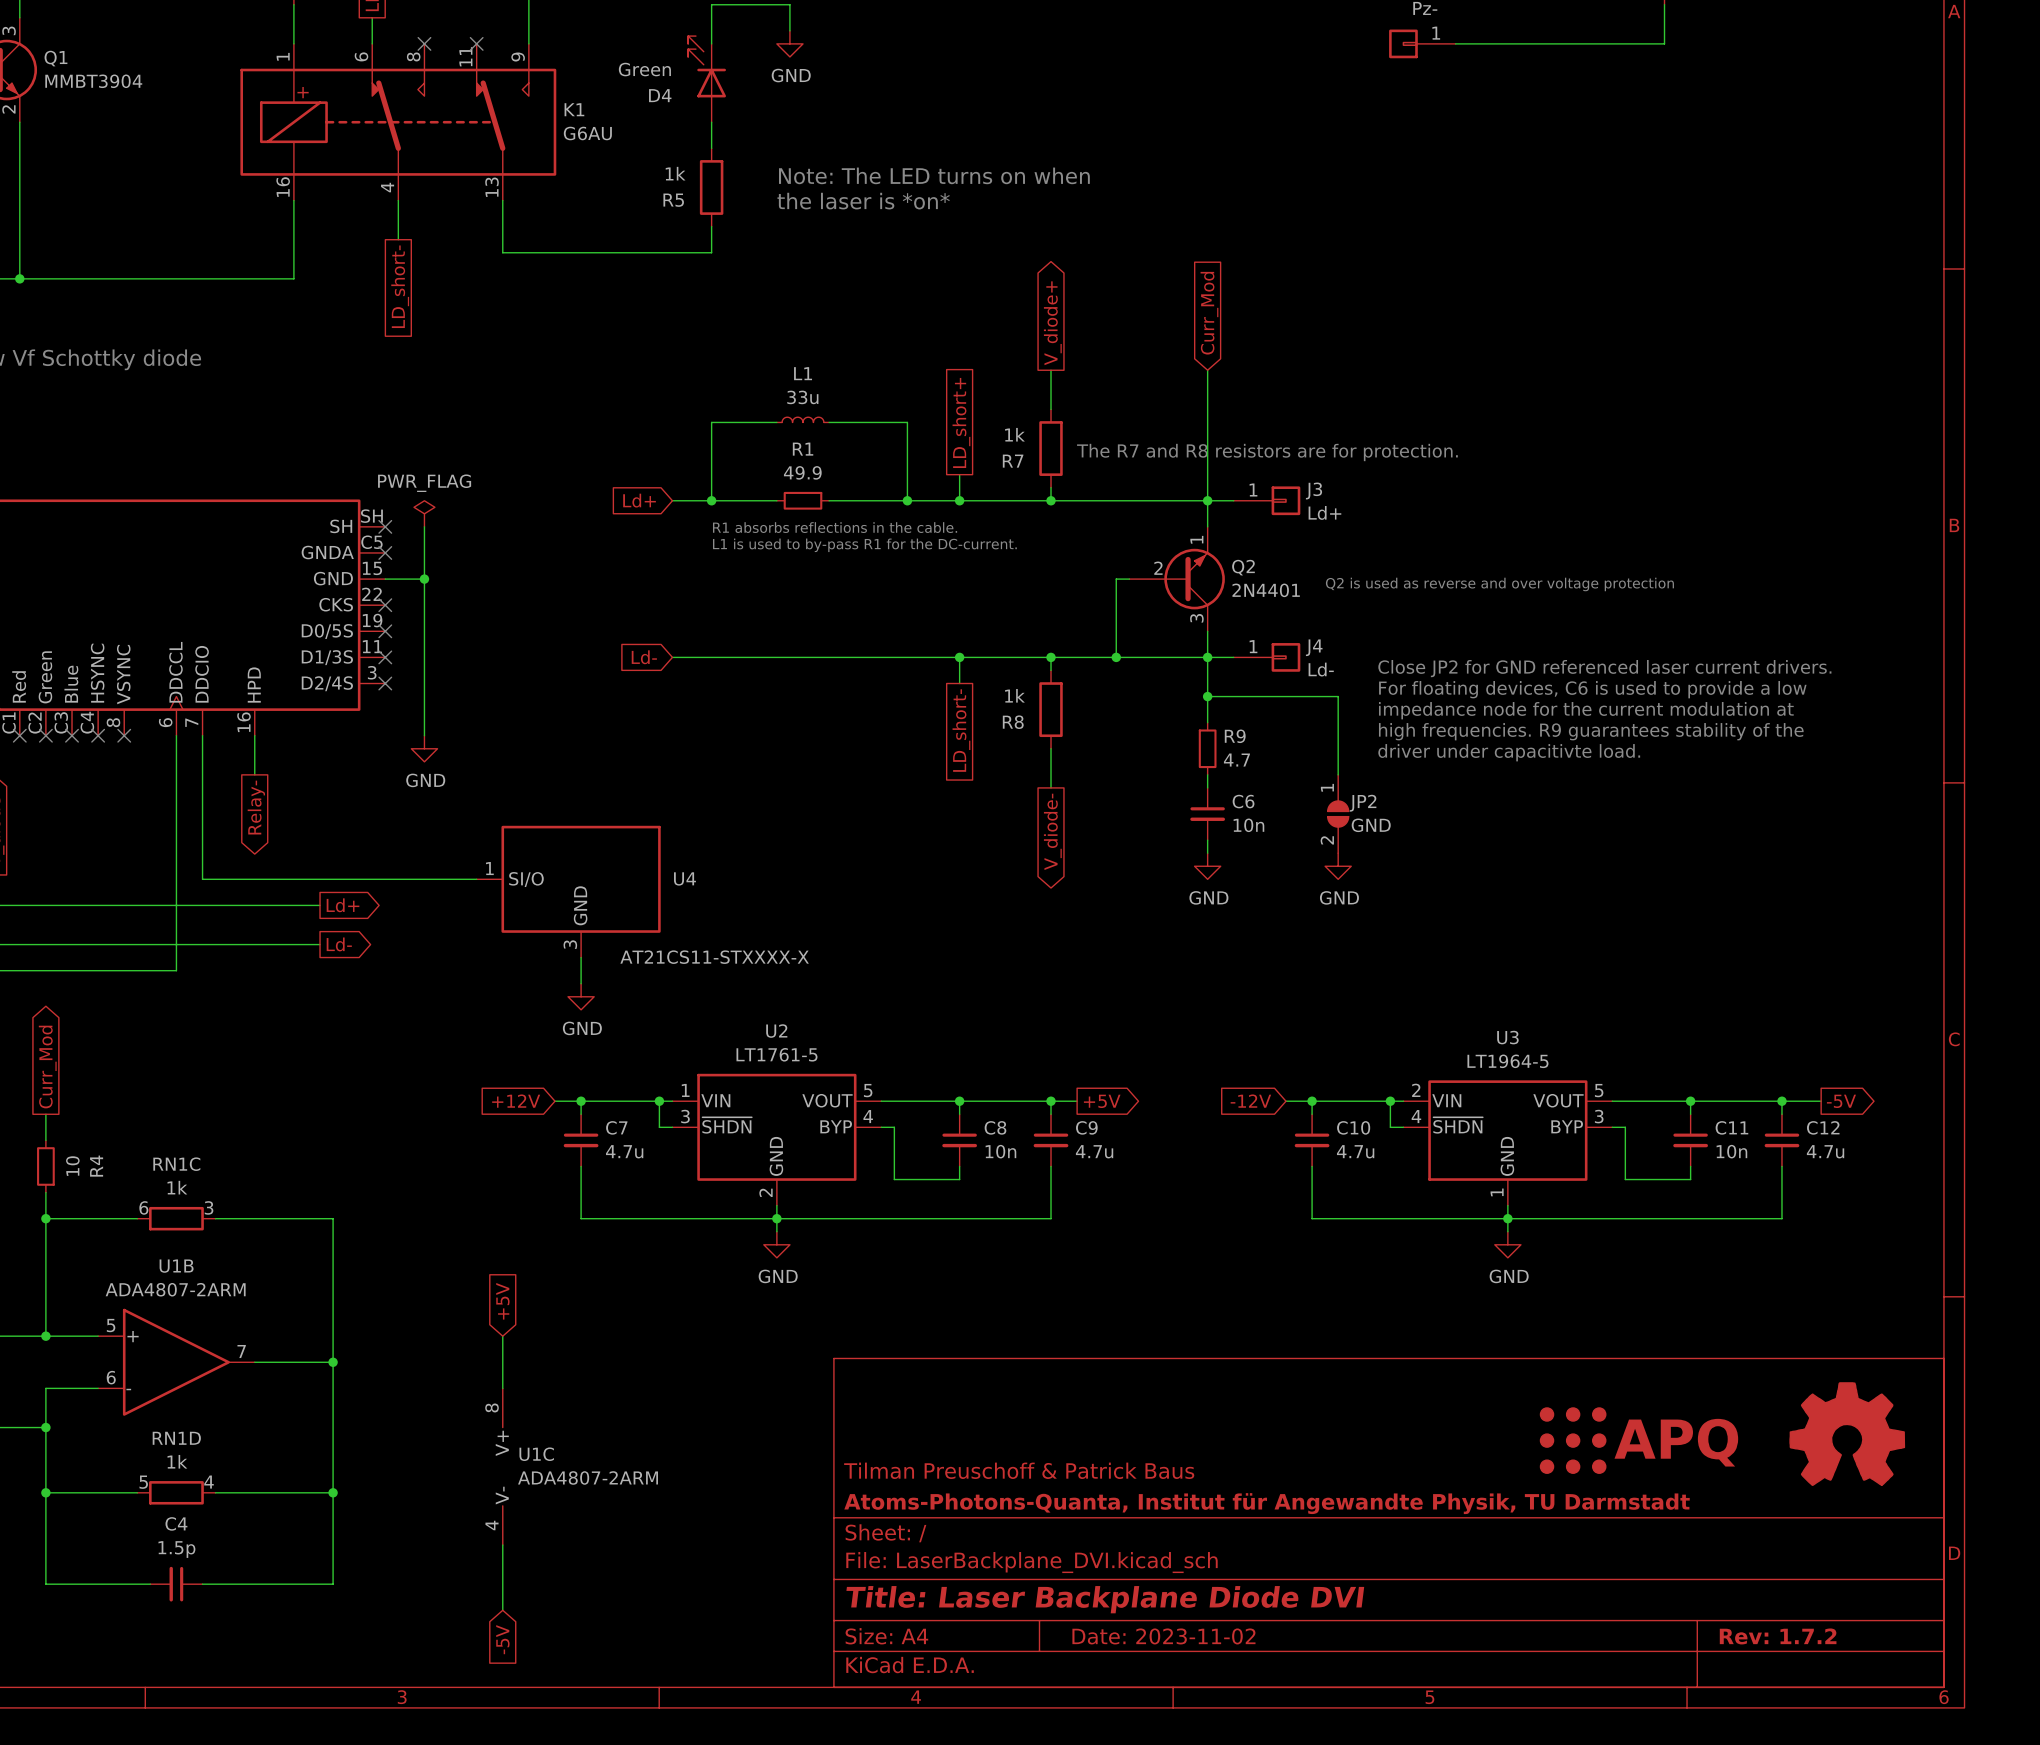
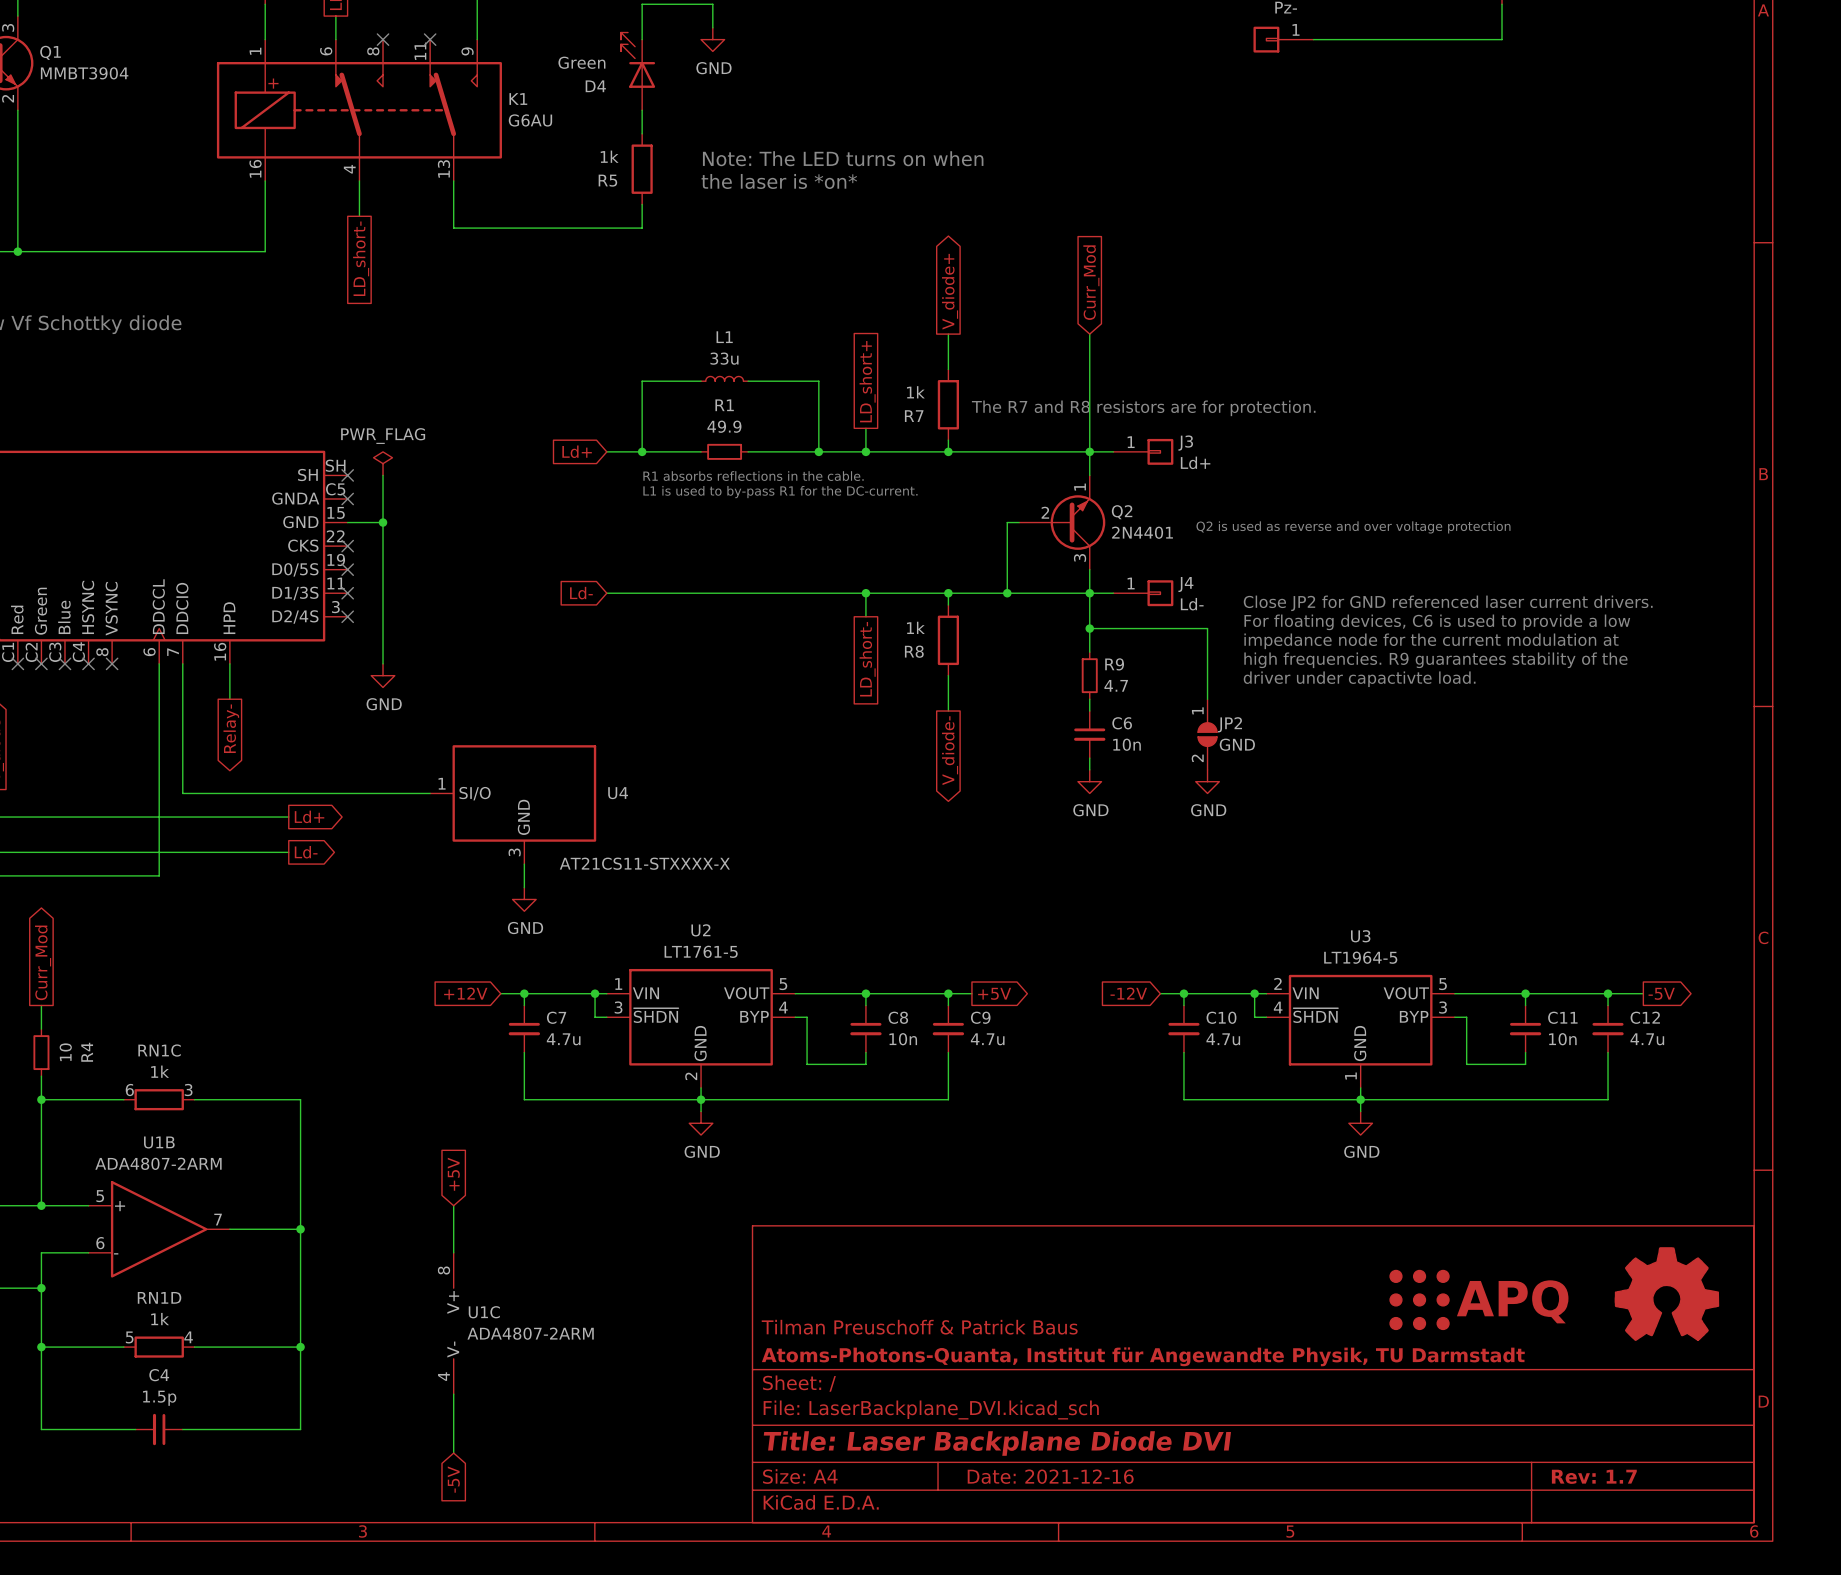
text: driver under capacitivte load. (1509, 752) -> driver under capactivte load. (1359, 679)
title block: Date: 2023-11-02 (1163, 1636) -> Date: 2021-12-16 (1050, 1476)
title block: Rev: 1.7.2 (1778, 1636) -> Rev: 1.7 (1594, 1476)

